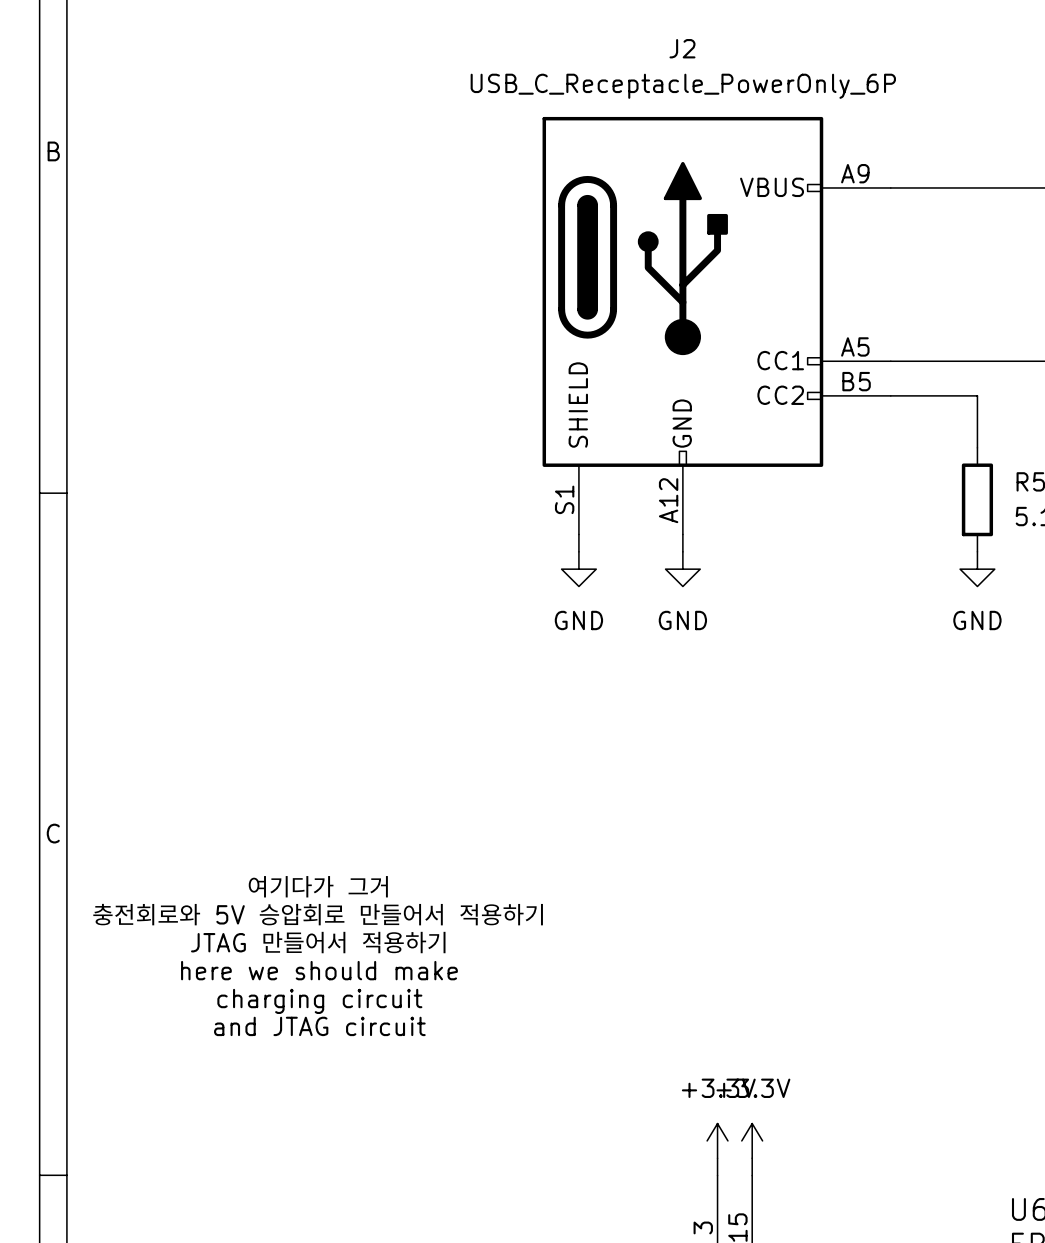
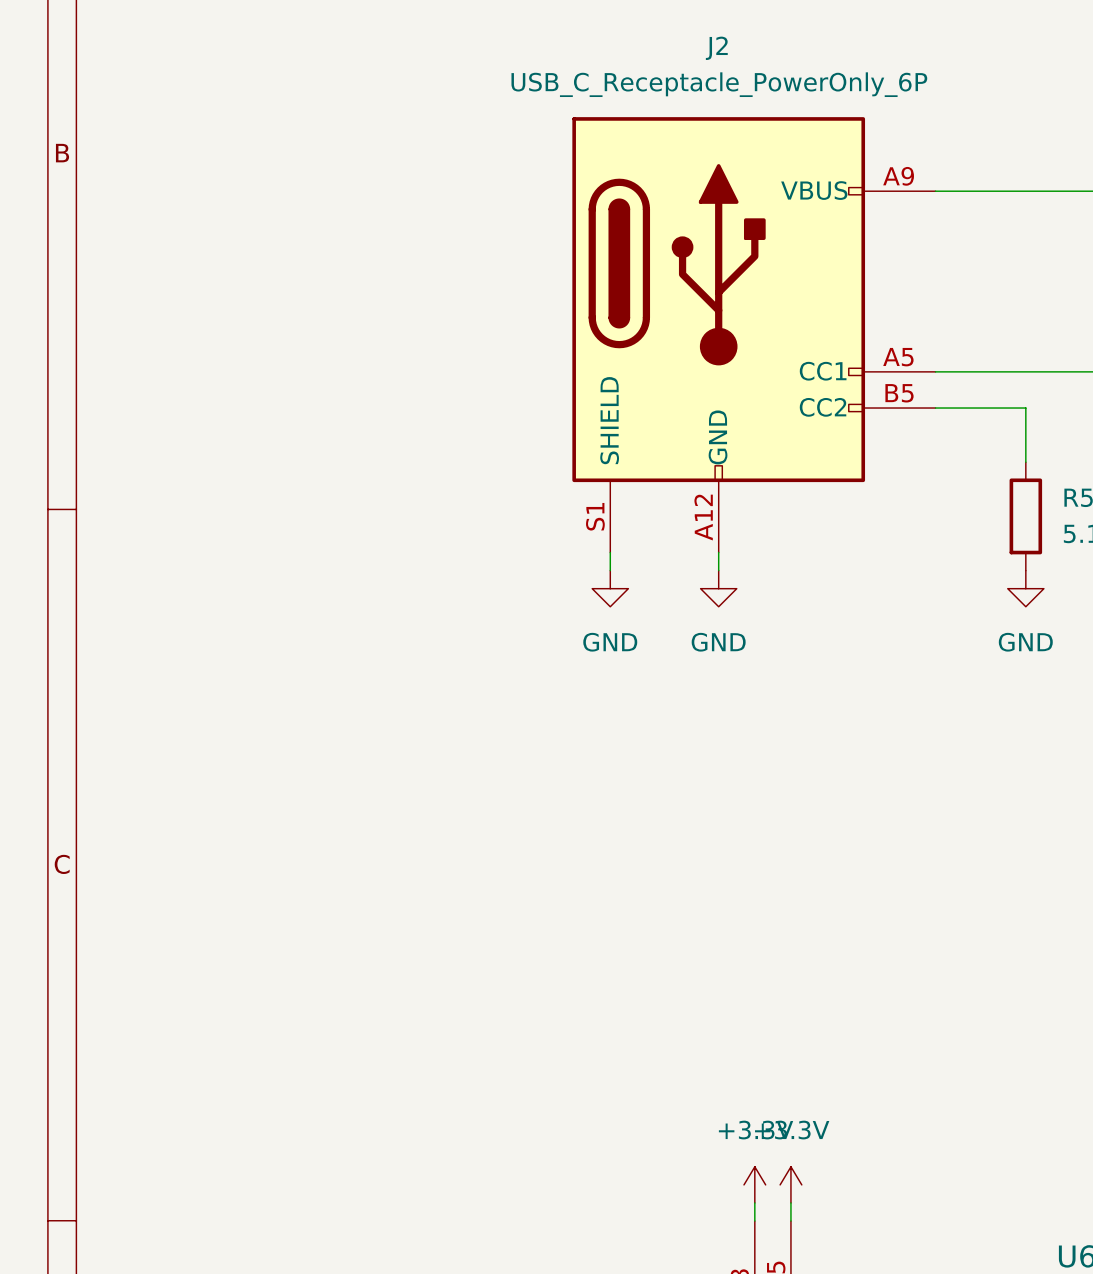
text: 여기다가 그거 (318, 886) -> none
text: 충전회로와 5V 승압회로 만들어서 적용하기 (318, 914) -> none
text: JTAG 만들어서 적용하기 (318, 942) -> none
text: here we should make (319, 970) -> none
text: charging circuit (319, 1001) -> none
text: and JTAG circuit (319, 1026) -> none

